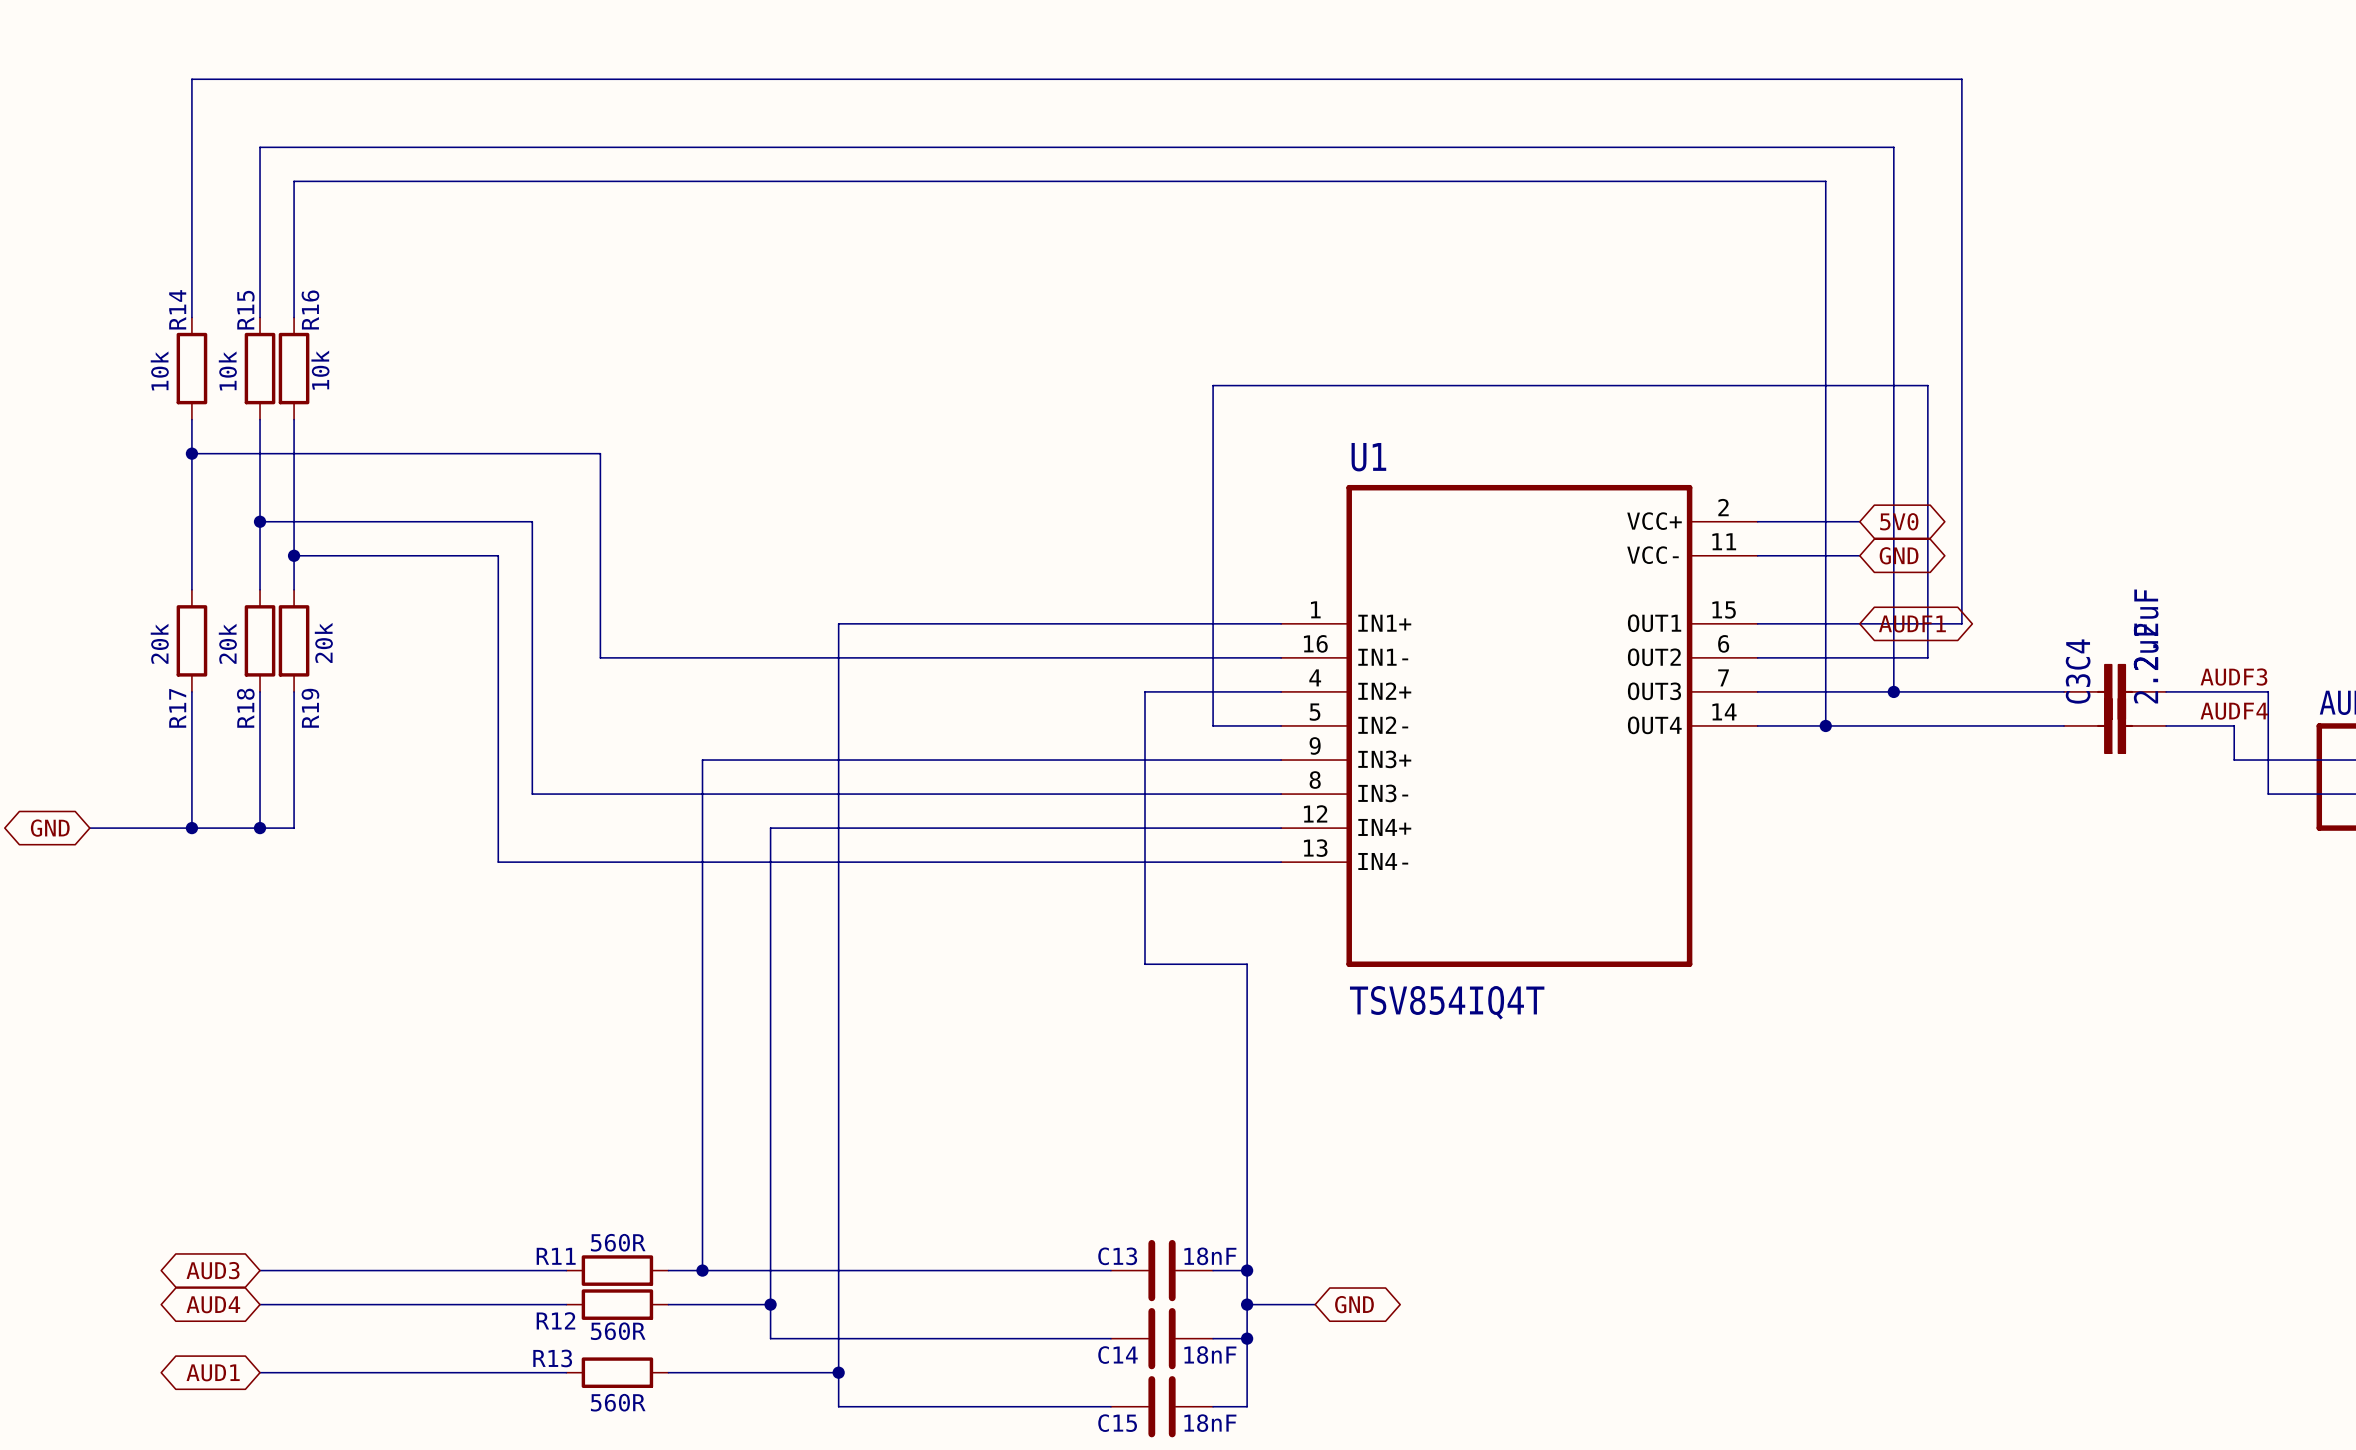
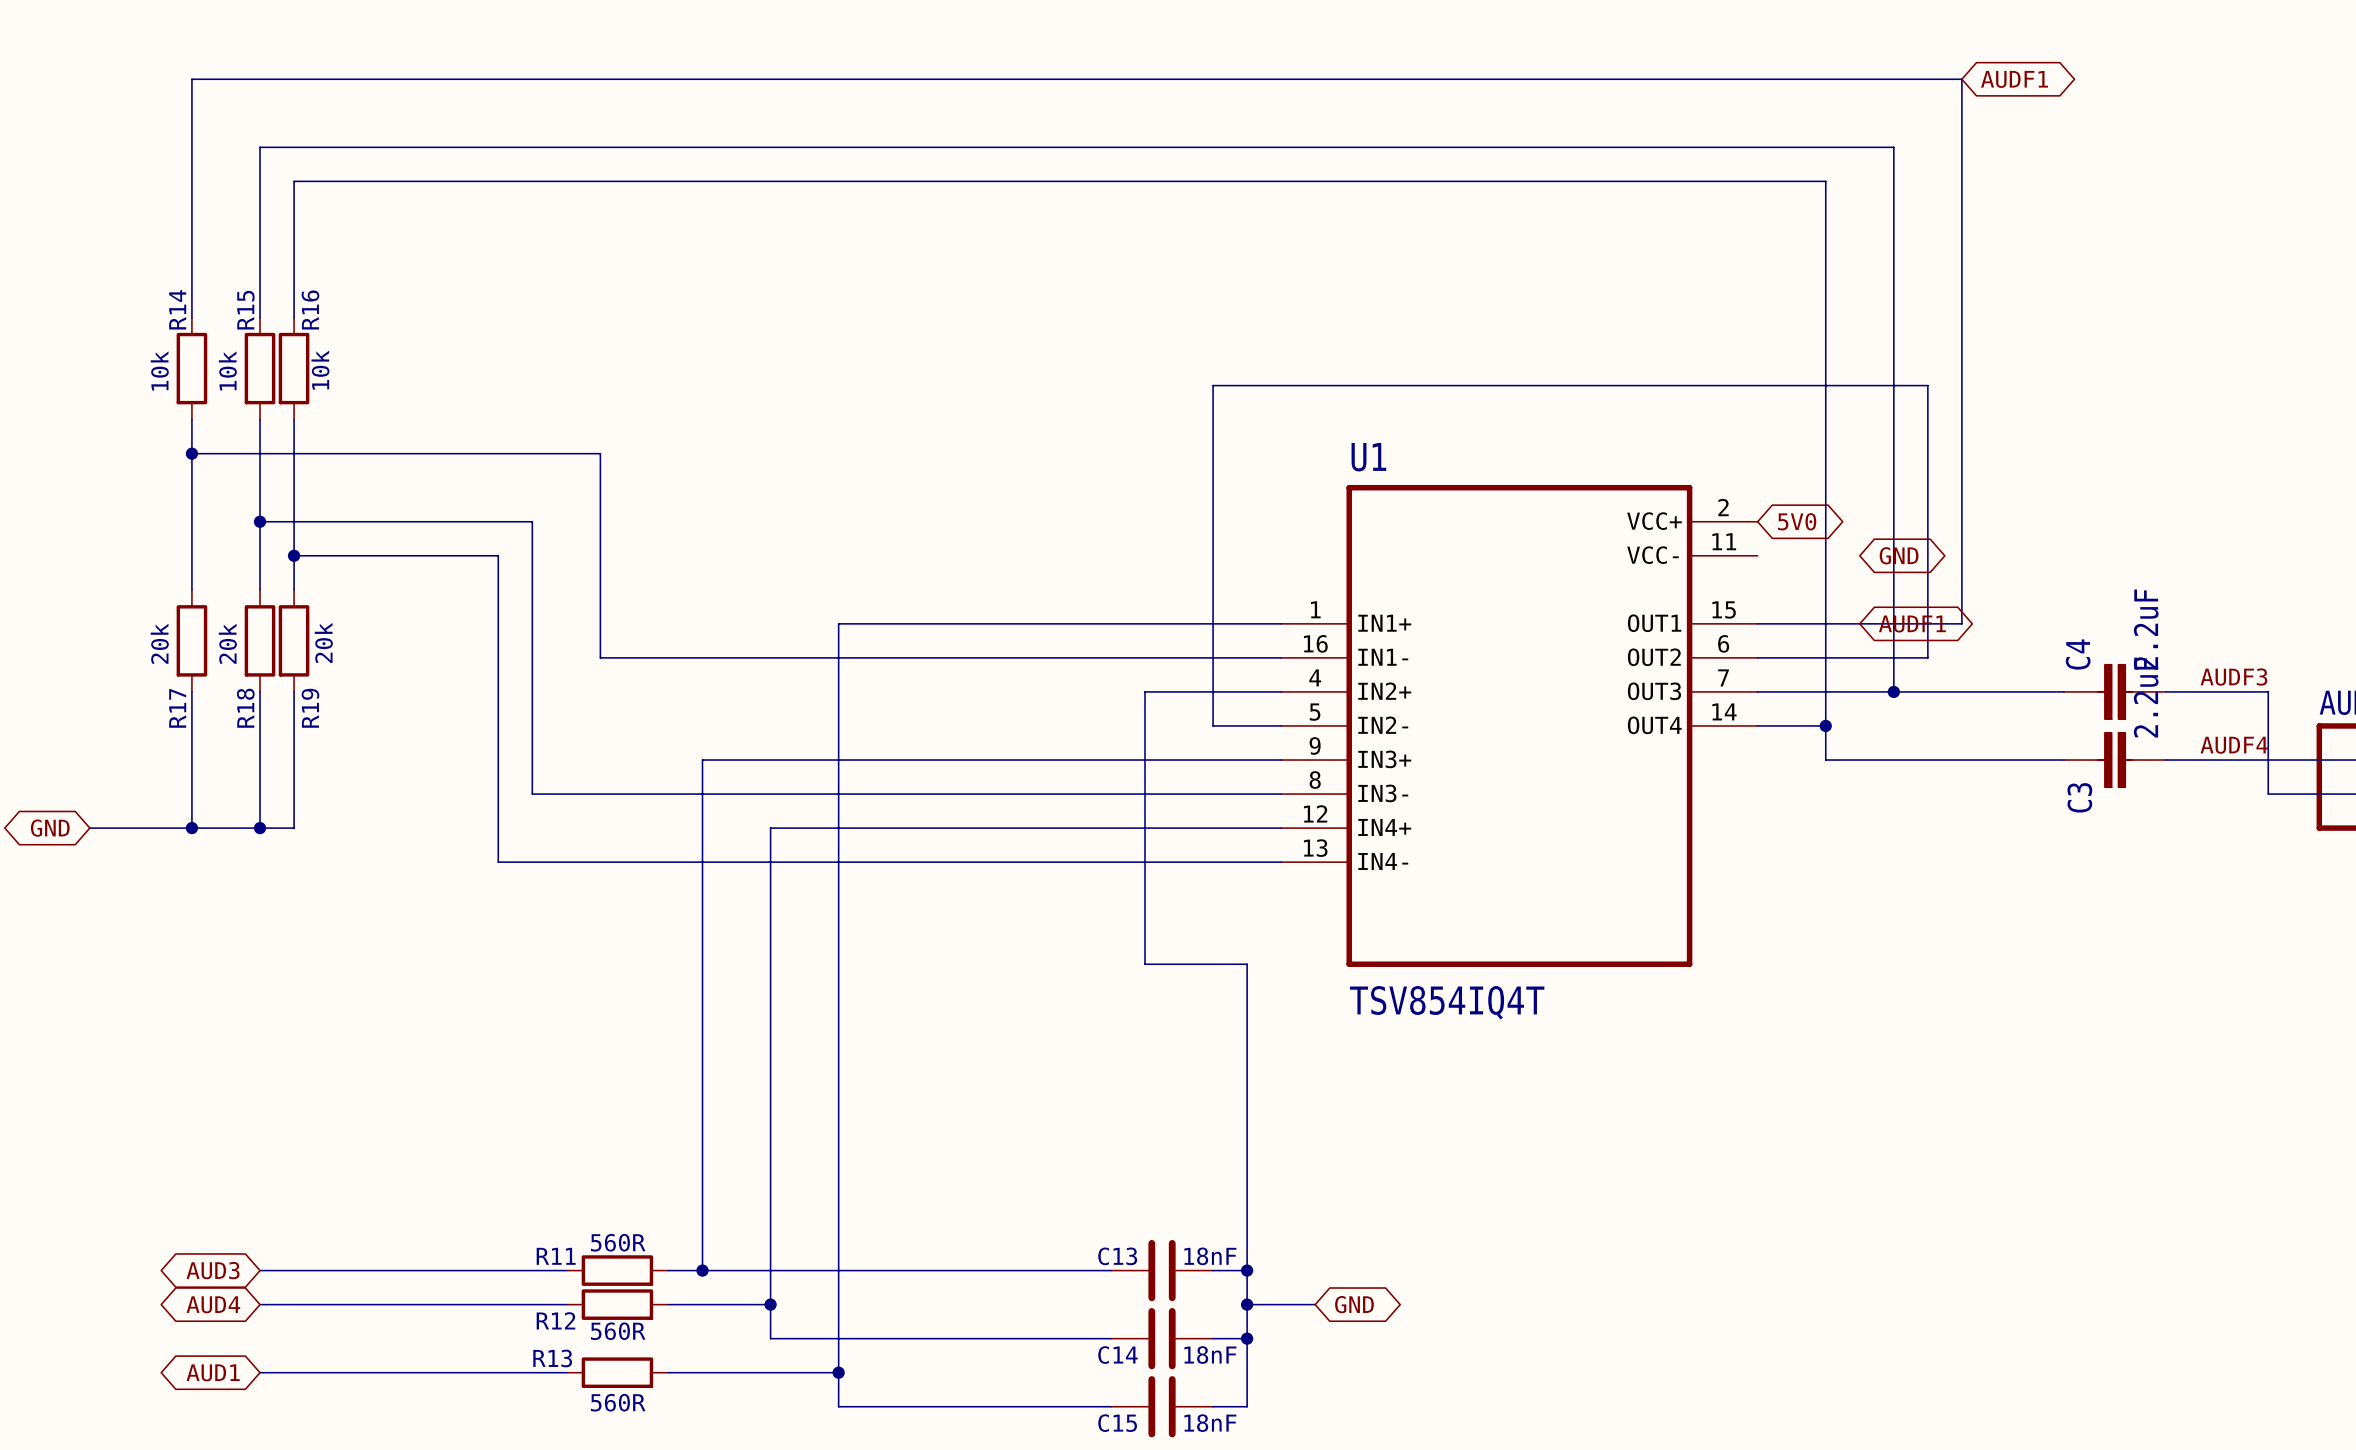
global label: none -> AUDF1 (2014, 79)
wire: (1757, 521) (1859, 521) -> none
global label position: 5V0 (1899, 521) -> 5V0 (1797, 521)
wire: (1757, 555) (1859, 555) -> none
C3 name position: C3 (2078, 688) -> C3 (2079, 797)
label position: AUDF4 (2234, 711) -> AUDF4 (2234, 745)
wire: (1825, 725) (2064, 725) -> (1825, 725) (1825, 760) (2064, 760)
C3 position: (2115, 725) -> (2115, 760)
wire: (2166, 725) (2234, 725) (2234, 760) -> (2166, 760) (2234, 760)

